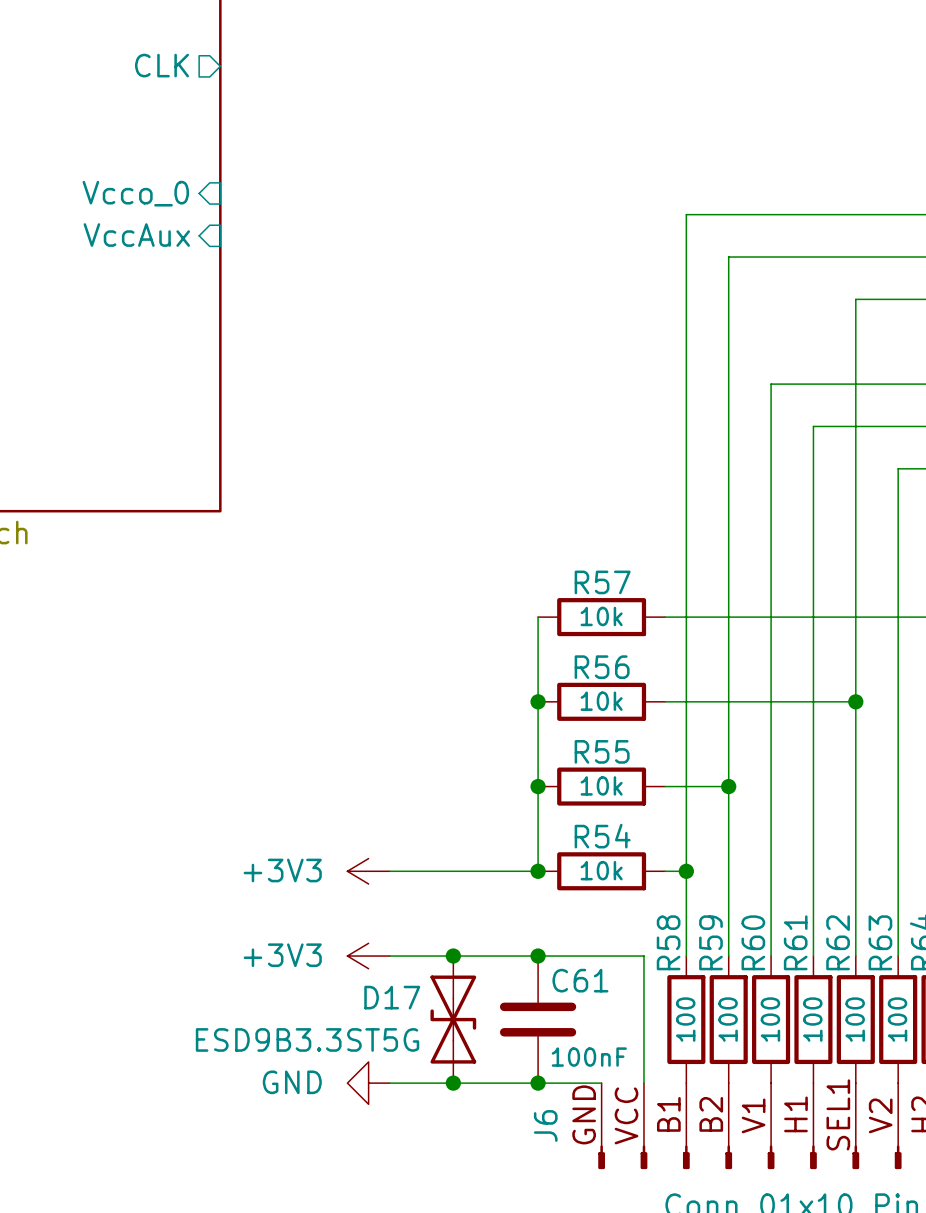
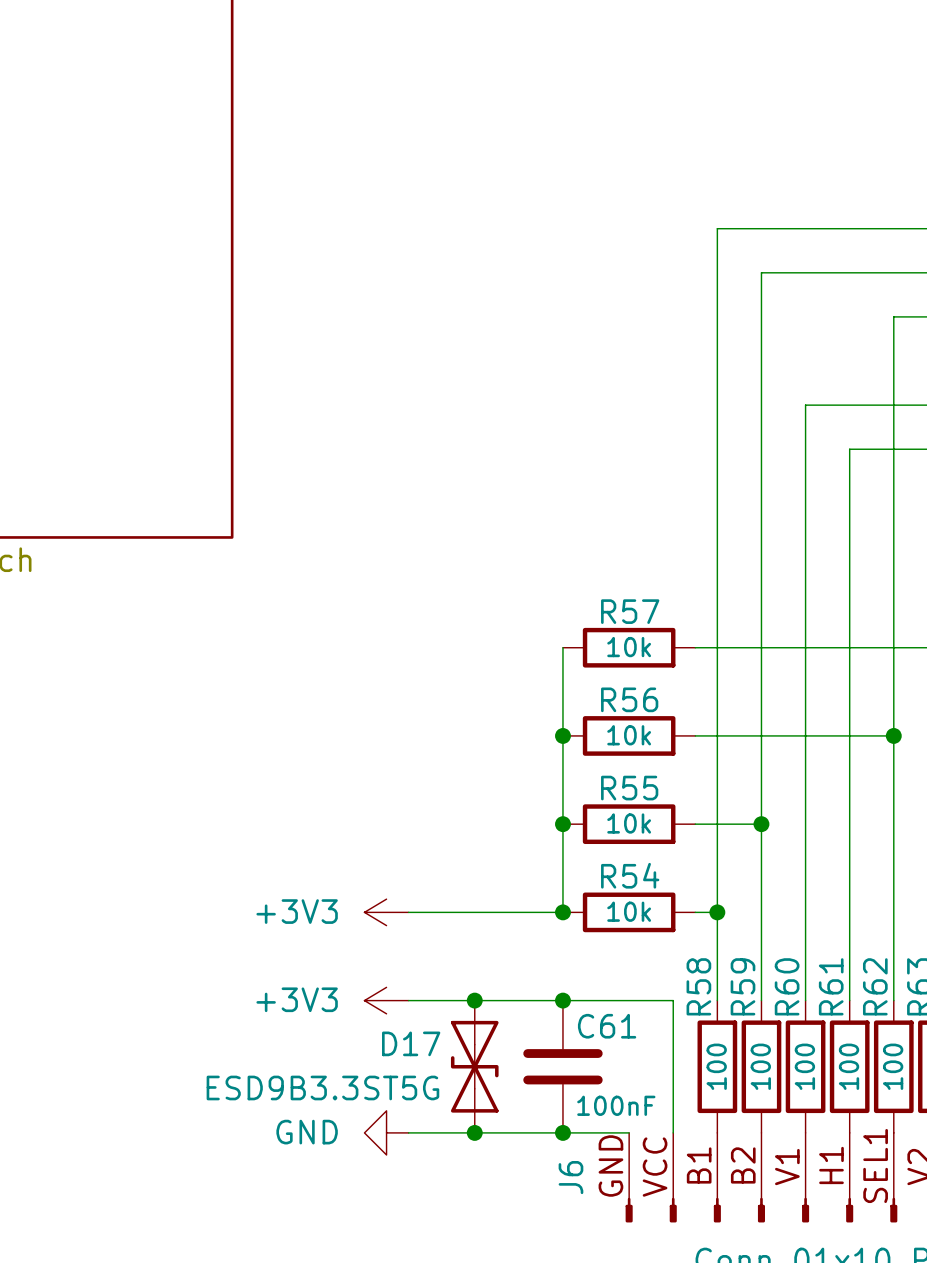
sheet pin: CLK (162, 65) -> none
sheet pin: Vcco_0 (135, 193) -> none
sheet pin: VccAux (136, 235) -> none

